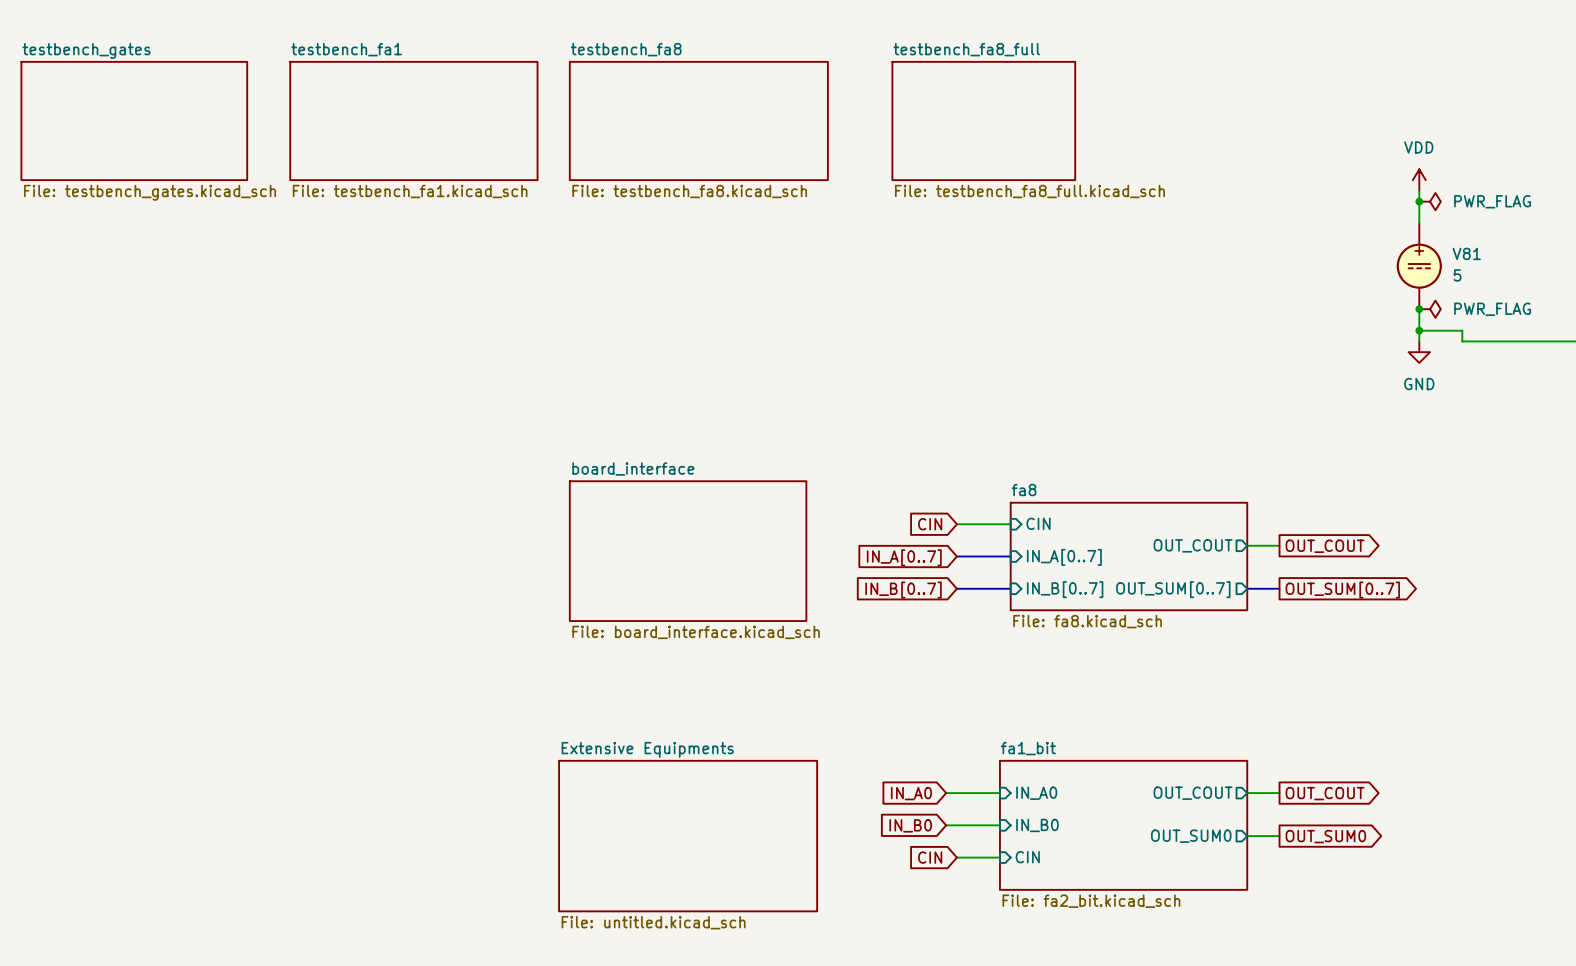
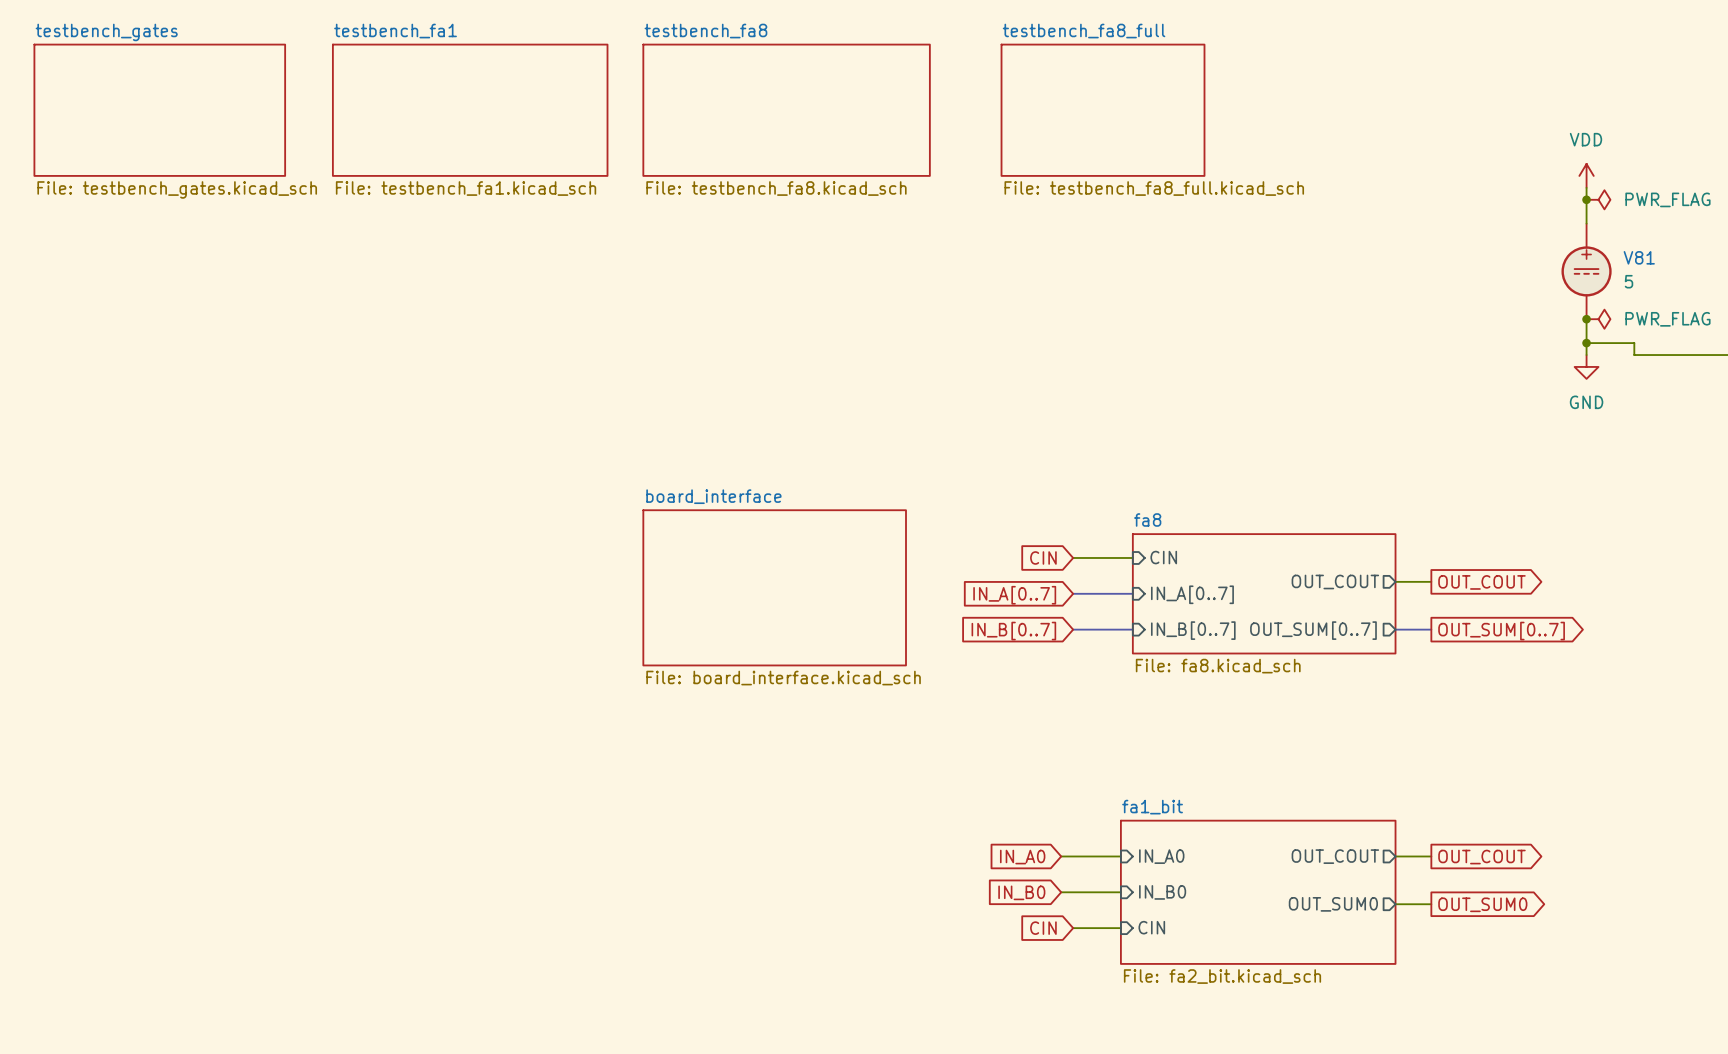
sheet Extensive Equipments: File: untitled.kicad_sch (688, 836) -> none

